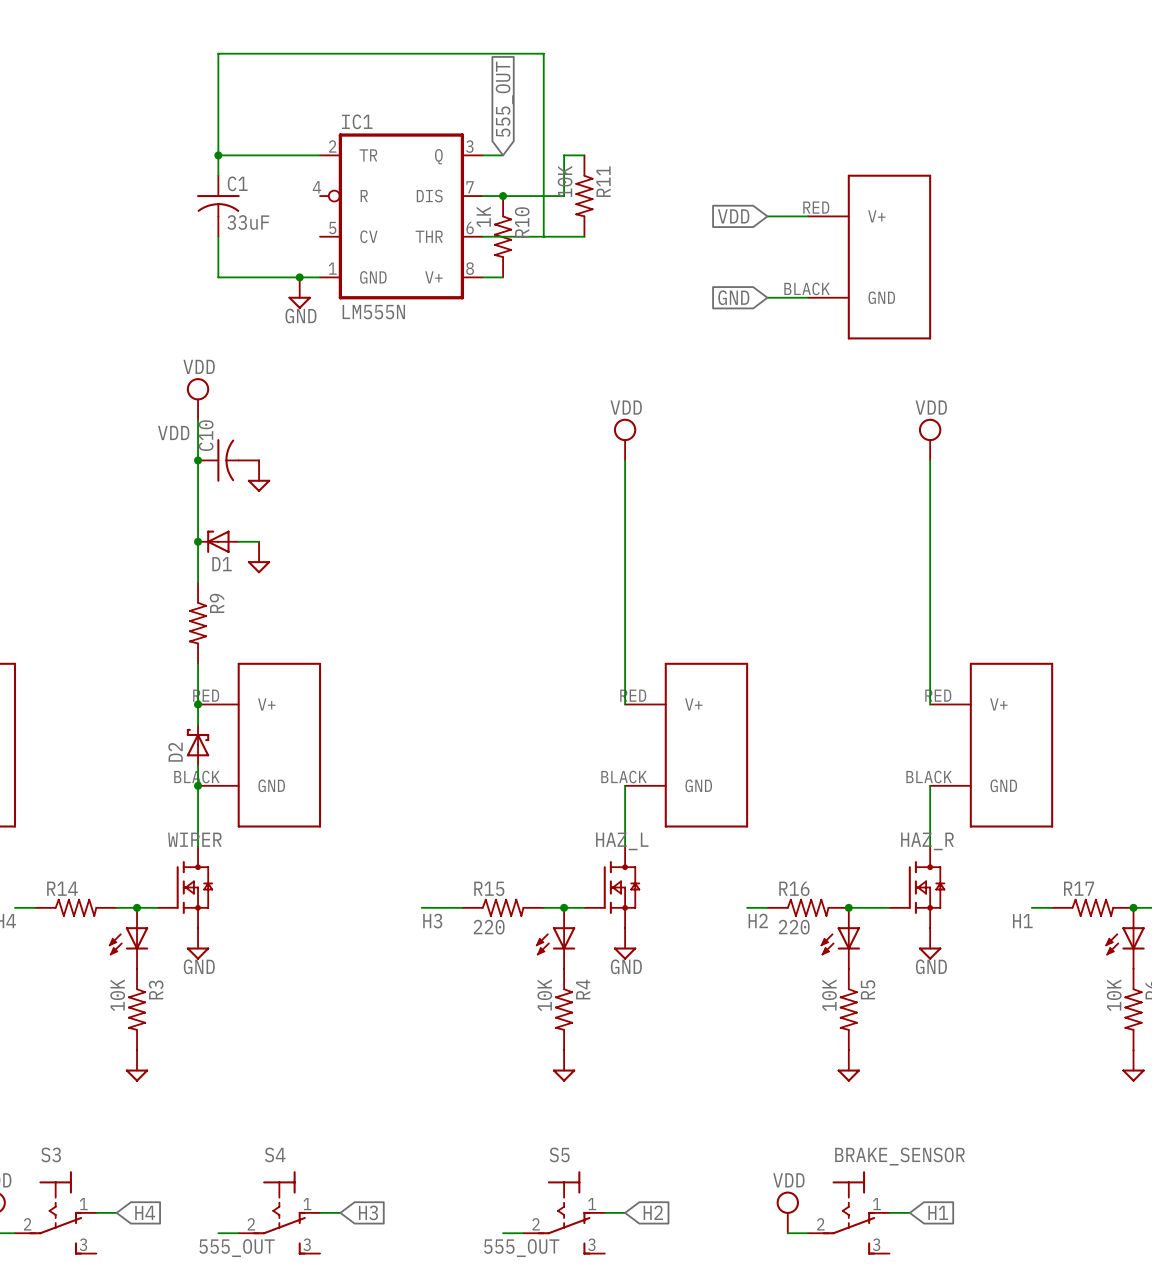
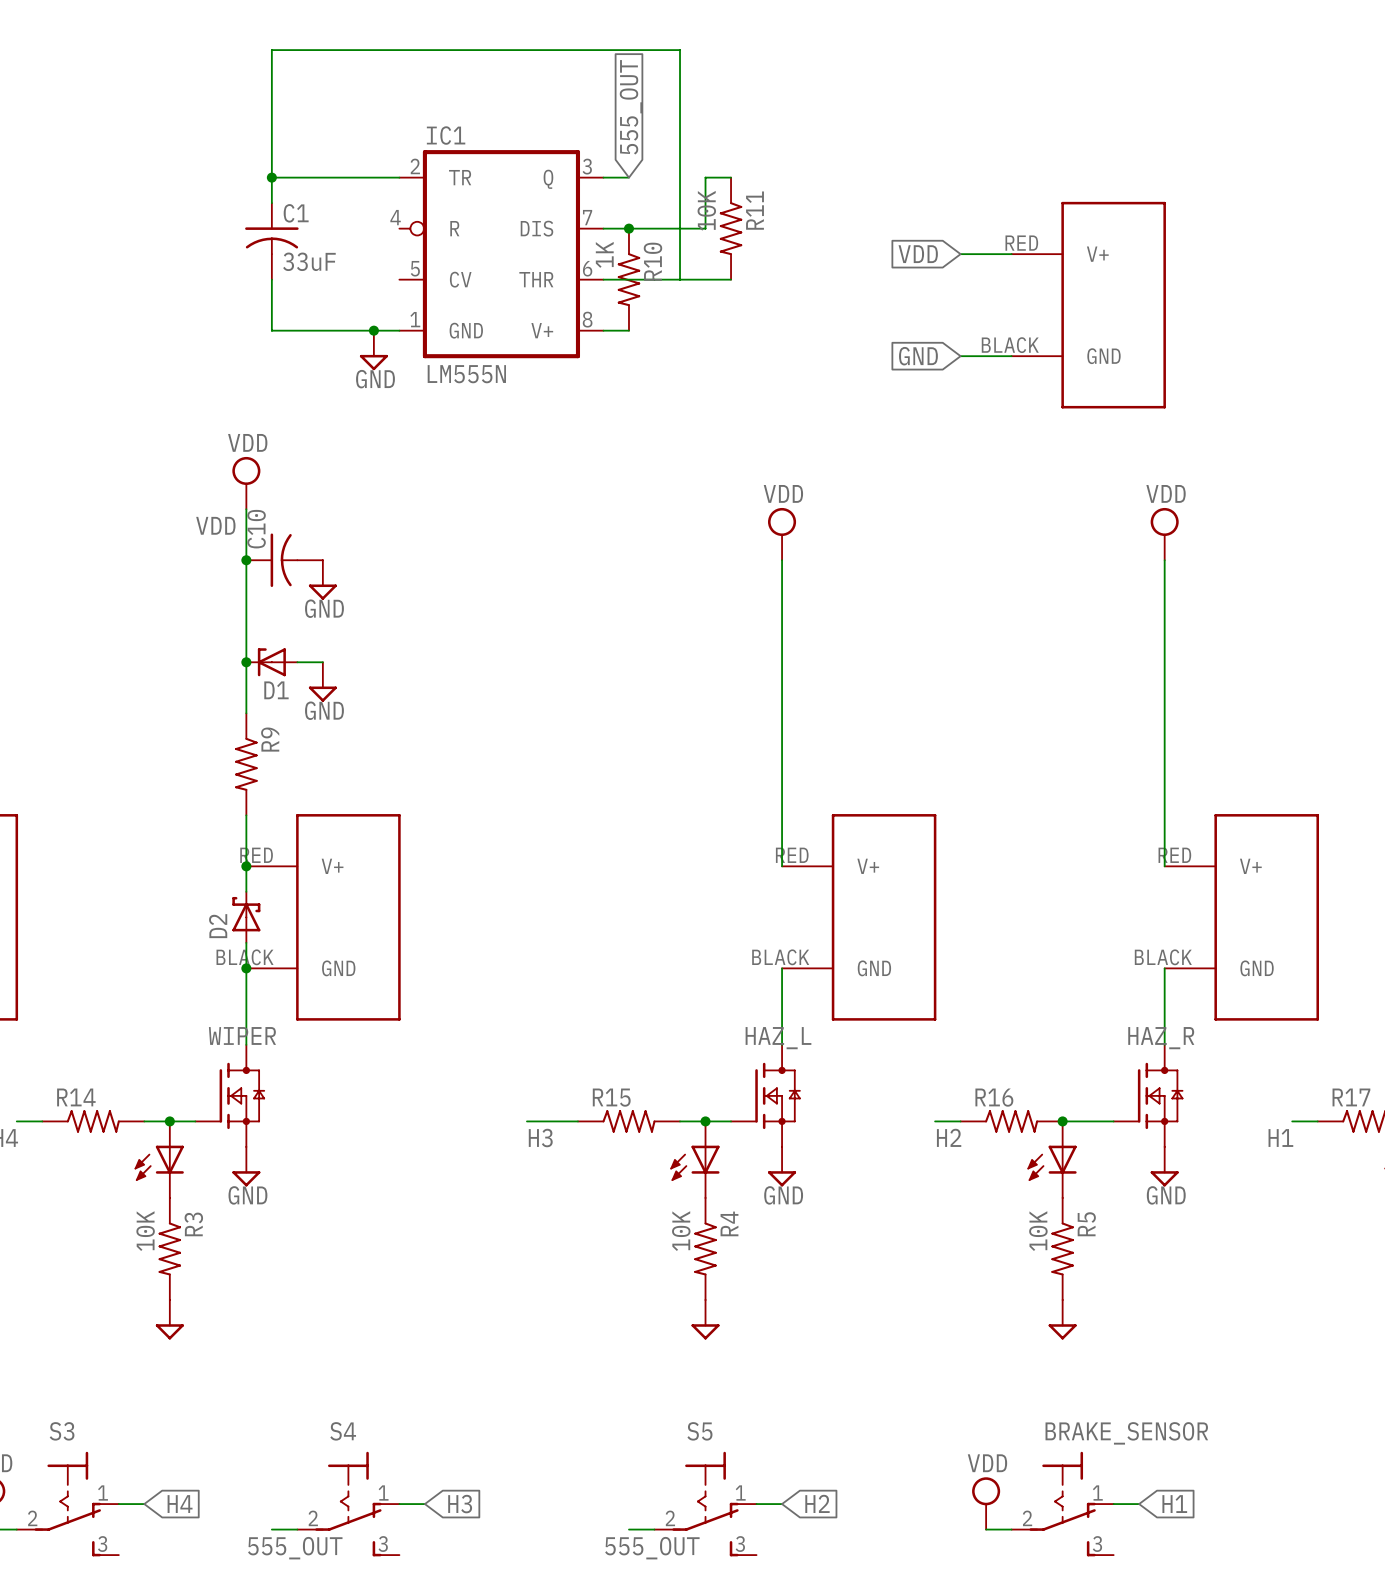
power symbol text: none -> GND (324, 608)
power symbol text: none -> GND (324, 710)
R15 value: 220 (489, 927) -> none
R16 value: 220 (794, 927) -> none

